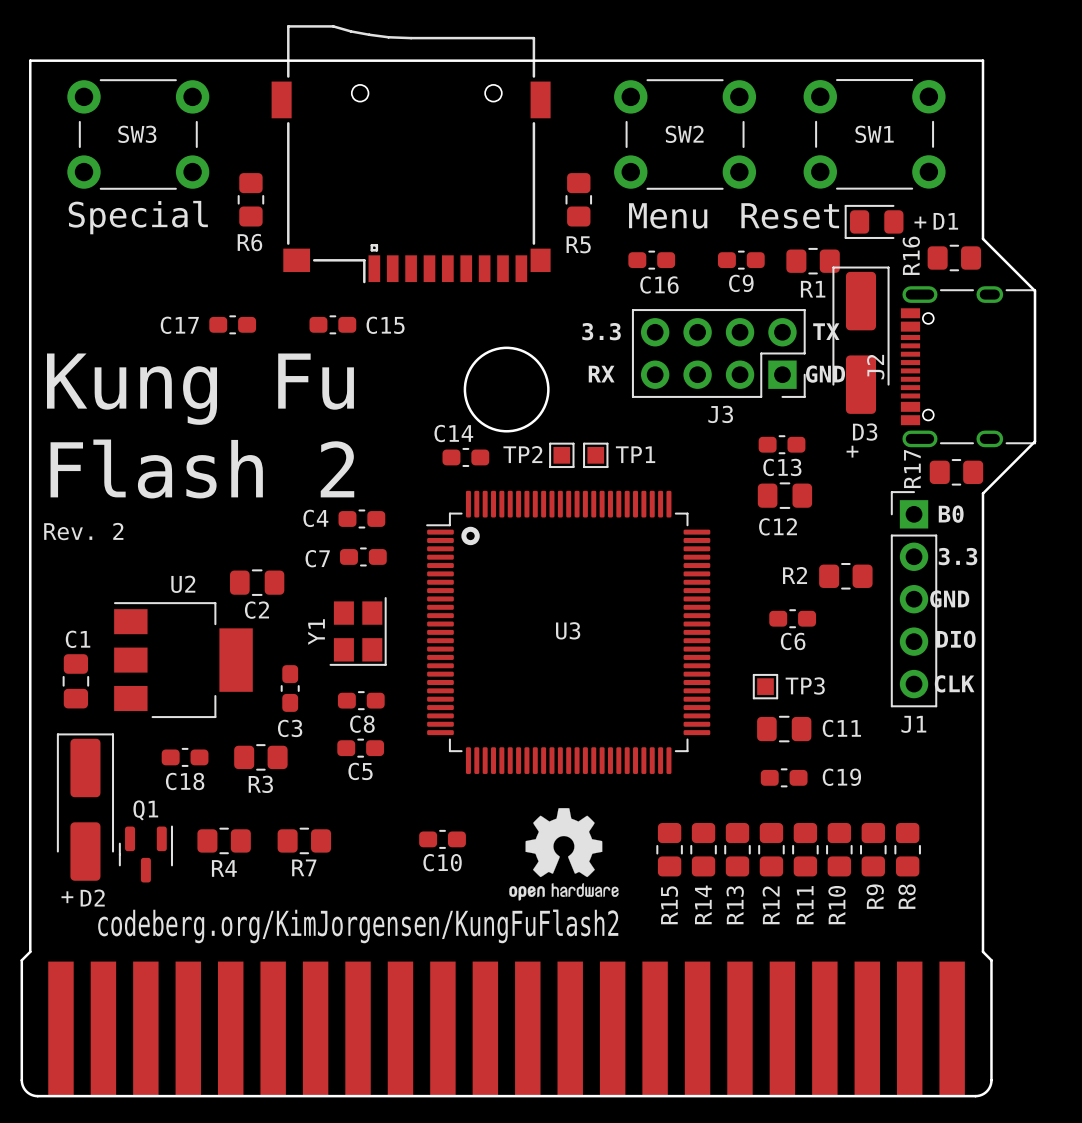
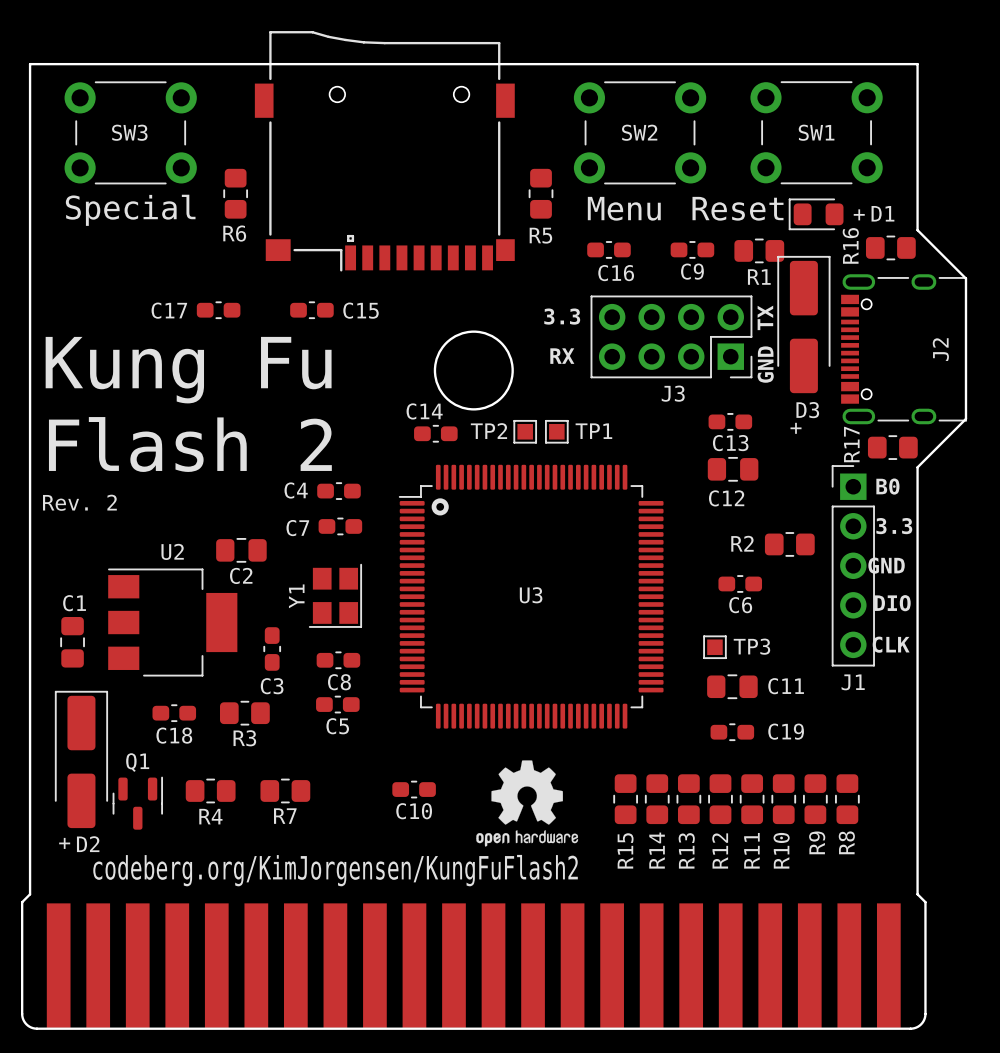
text rotation: 0° (826, 331) -> 90° counterclockwise (765, 317)
J2 name position: J2 (875, 367) -> J2 (940, 349)
text rotation: 0° (825, 374) -> 90° counterclockwise (765, 364)

